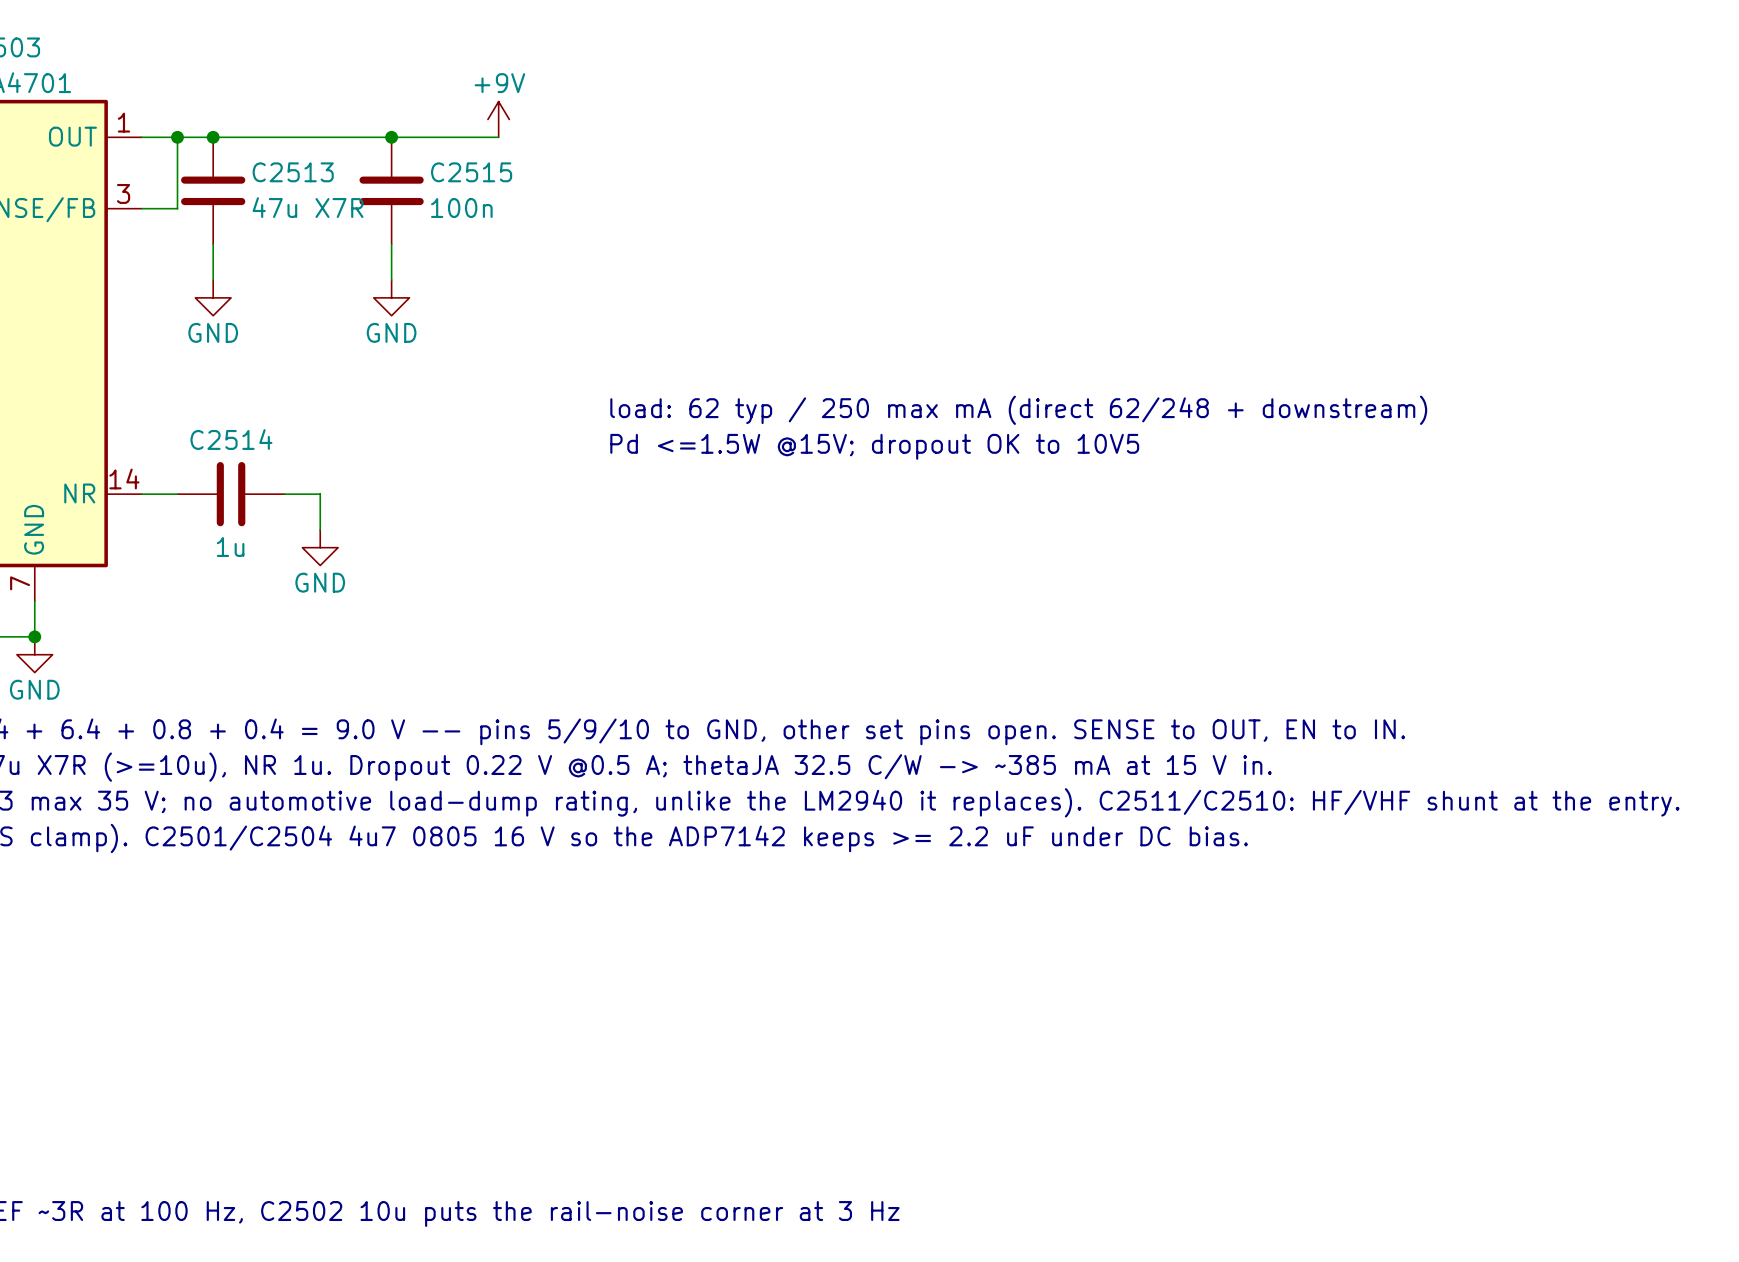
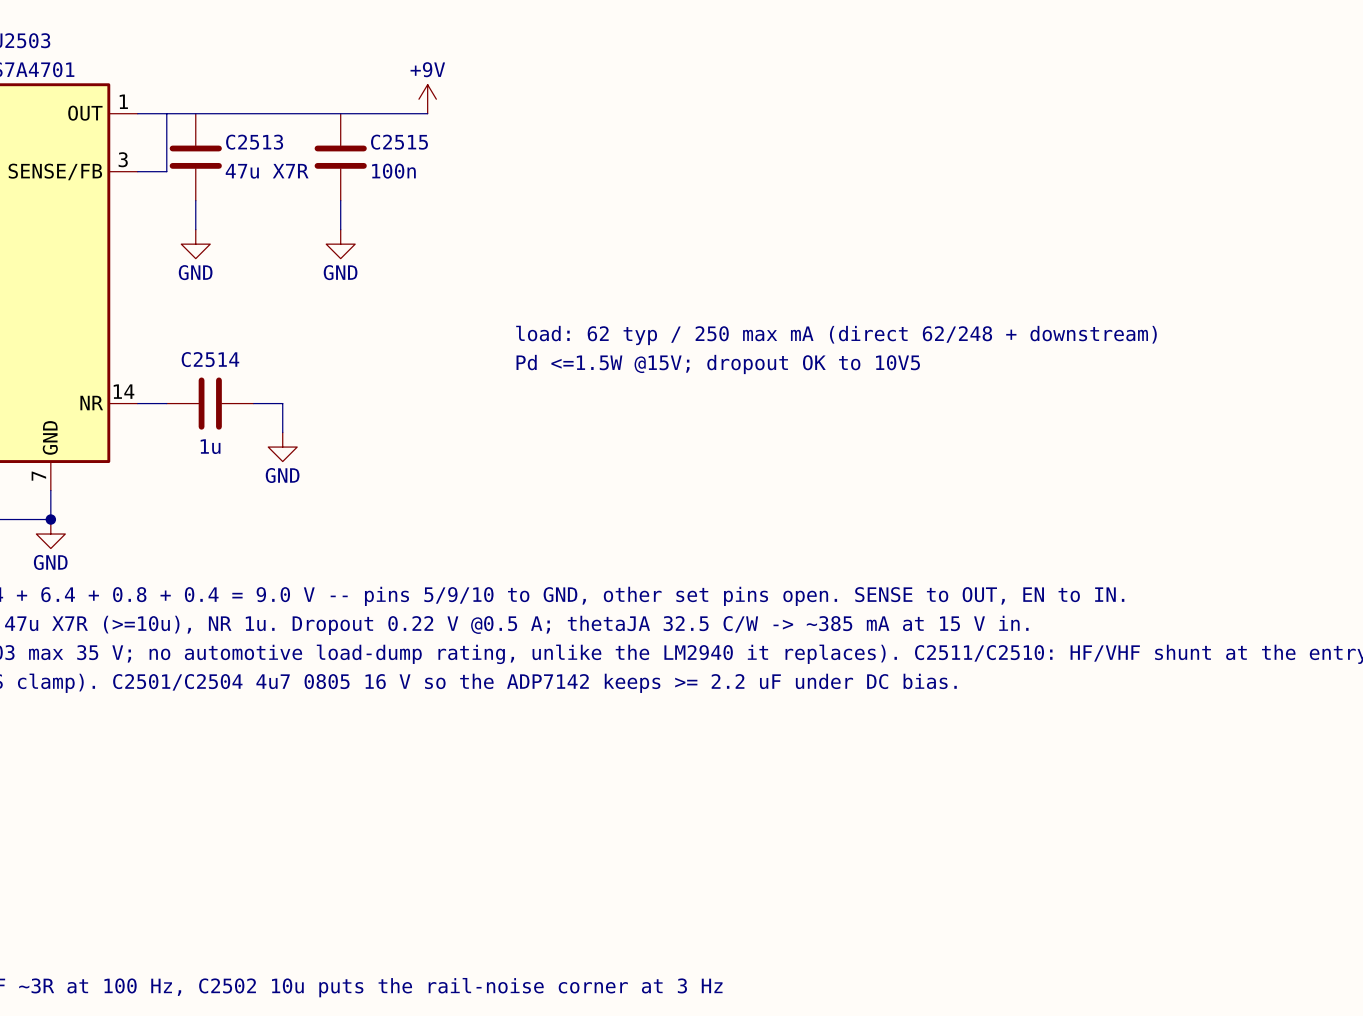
junction: (177, 137) -> none
junction: (213, 137) -> none
junction: (391, 137) -> none

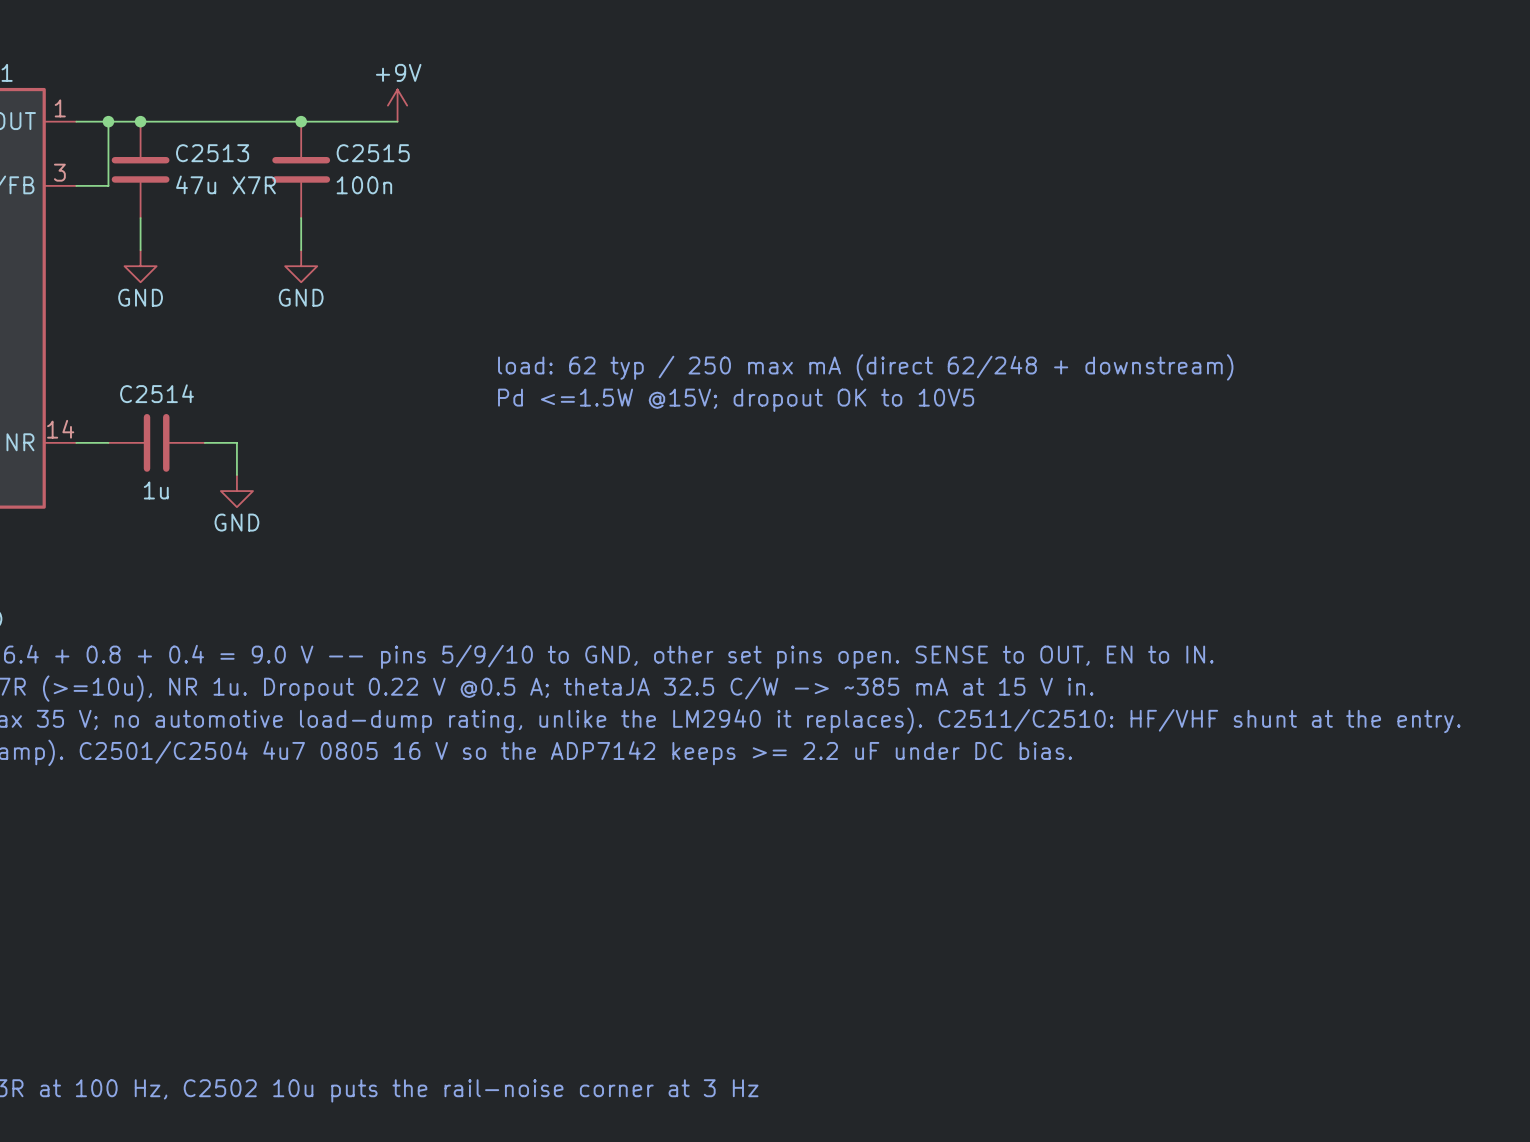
junction: none -> (108, 121)
junction: none -> (140, 121)
junction: none -> (301, 121)

